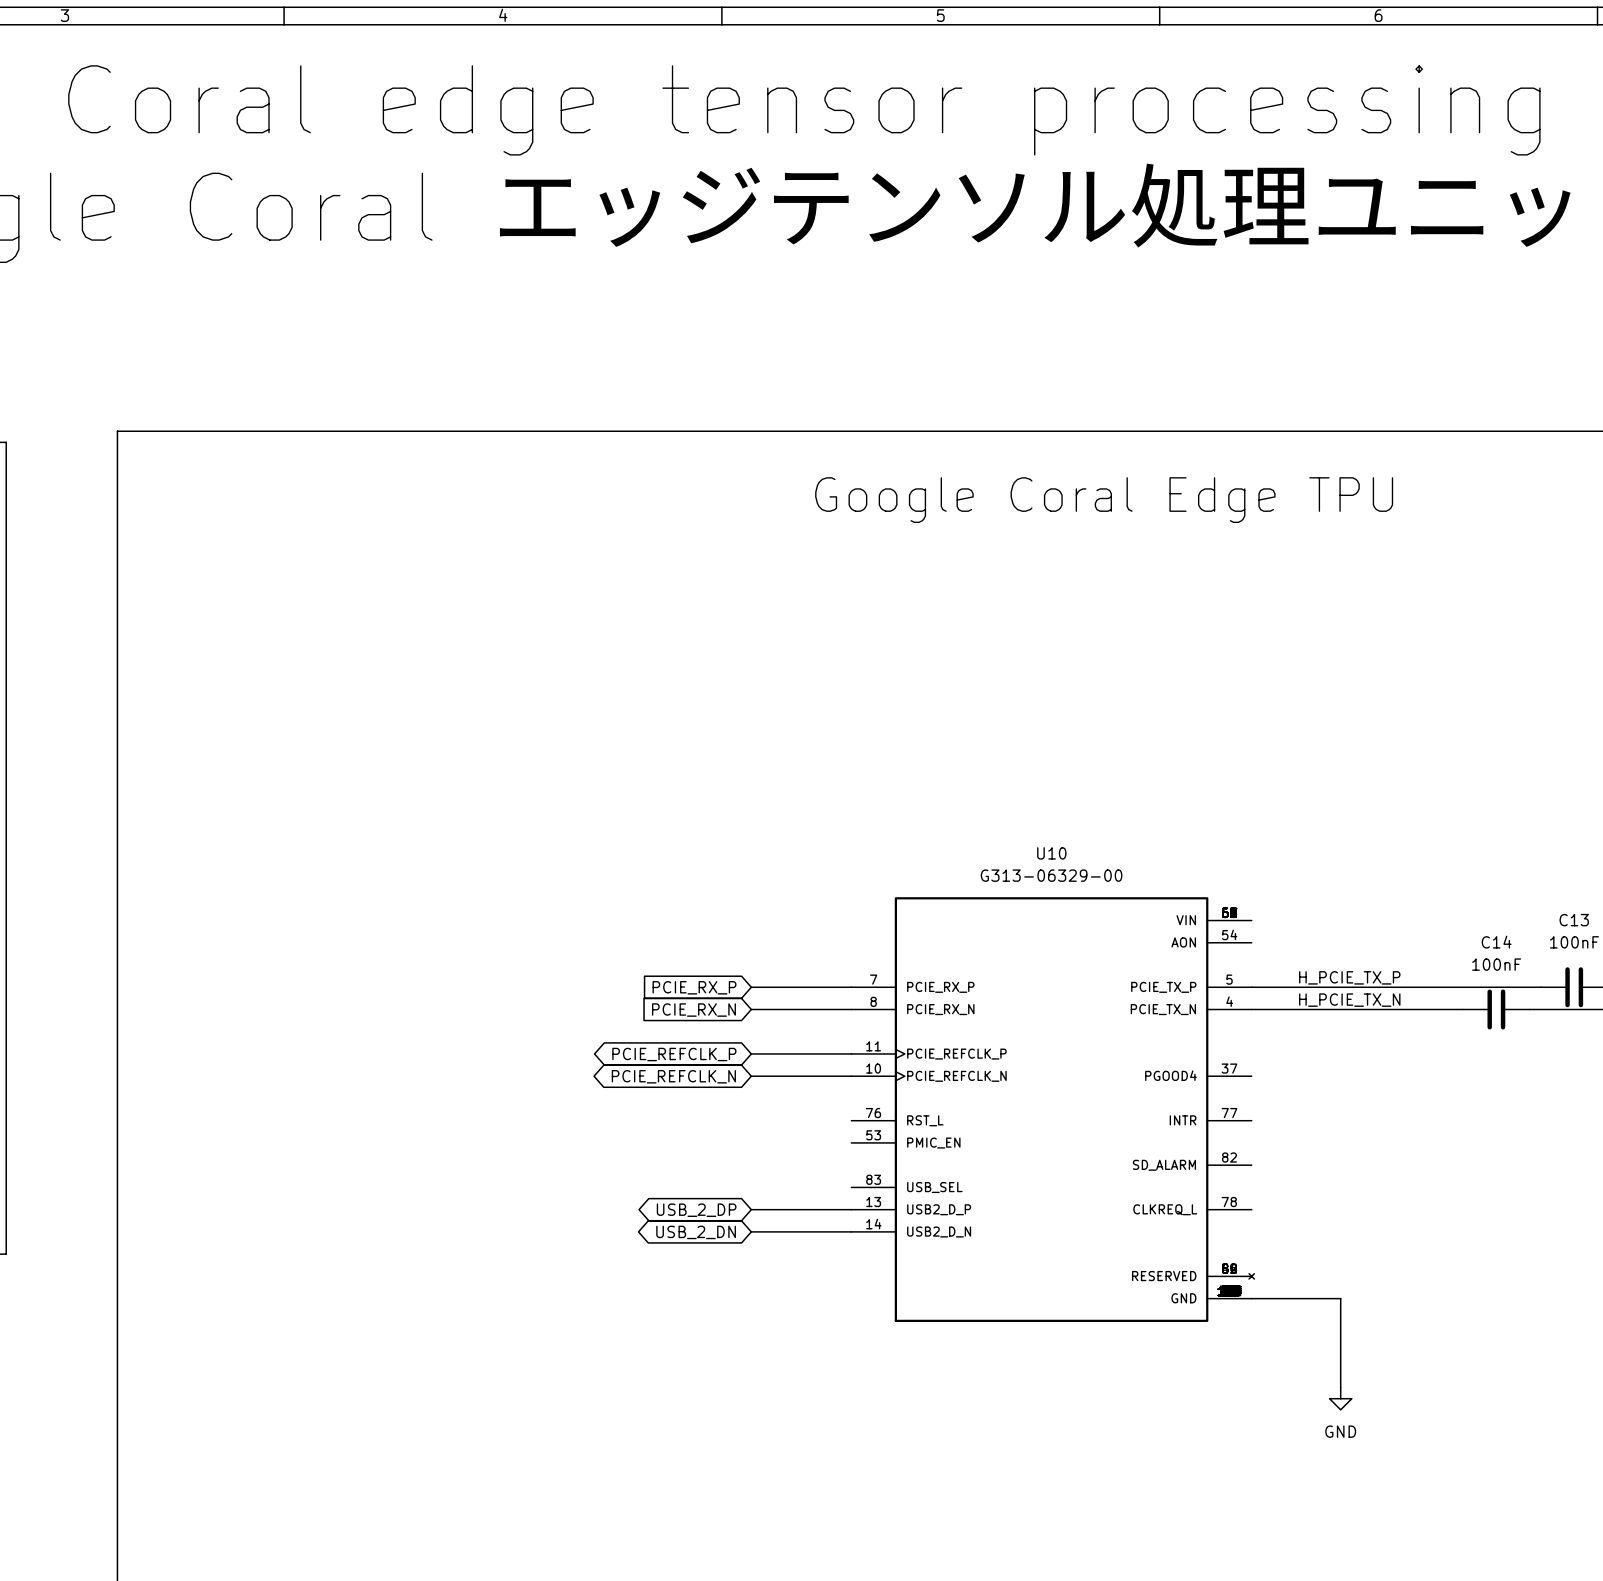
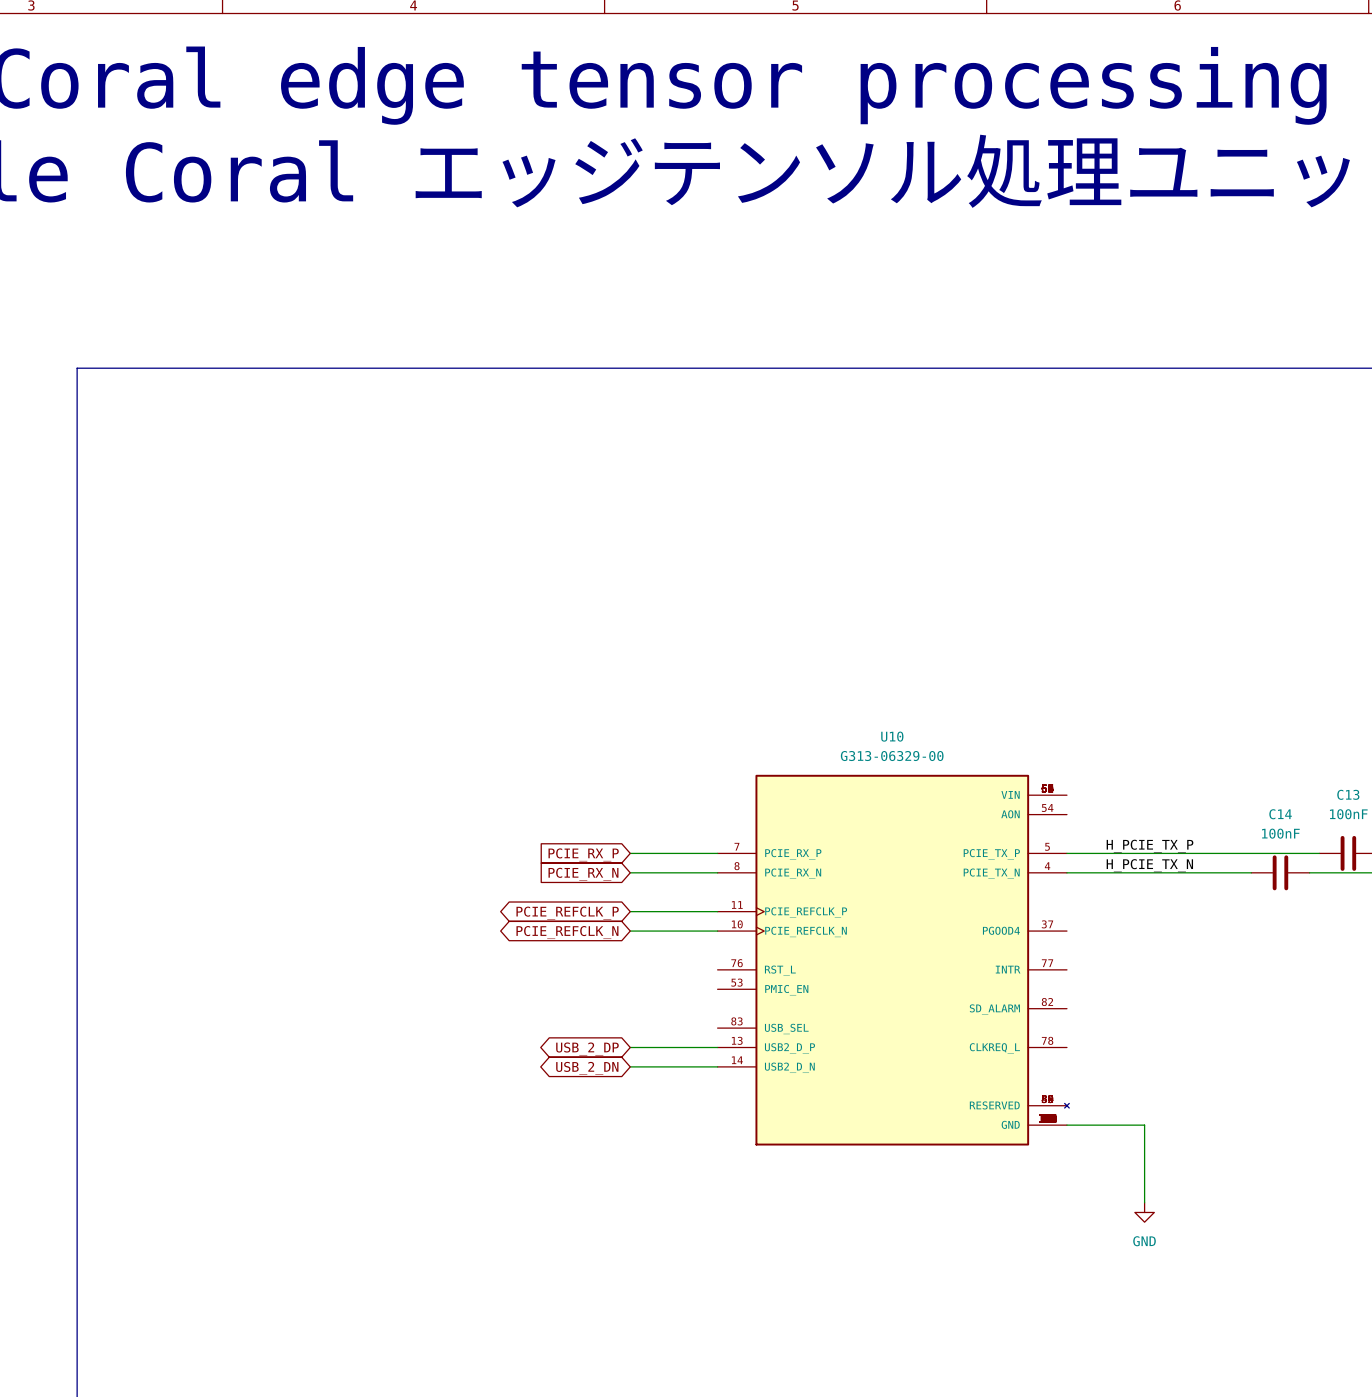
text: Google Coral Edge TPU (1104, 500) -> none

